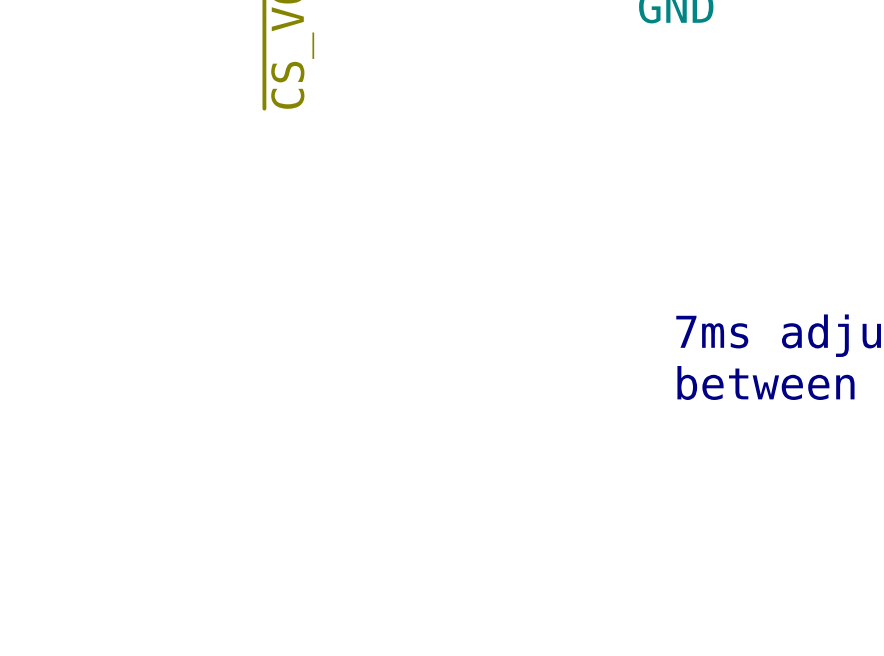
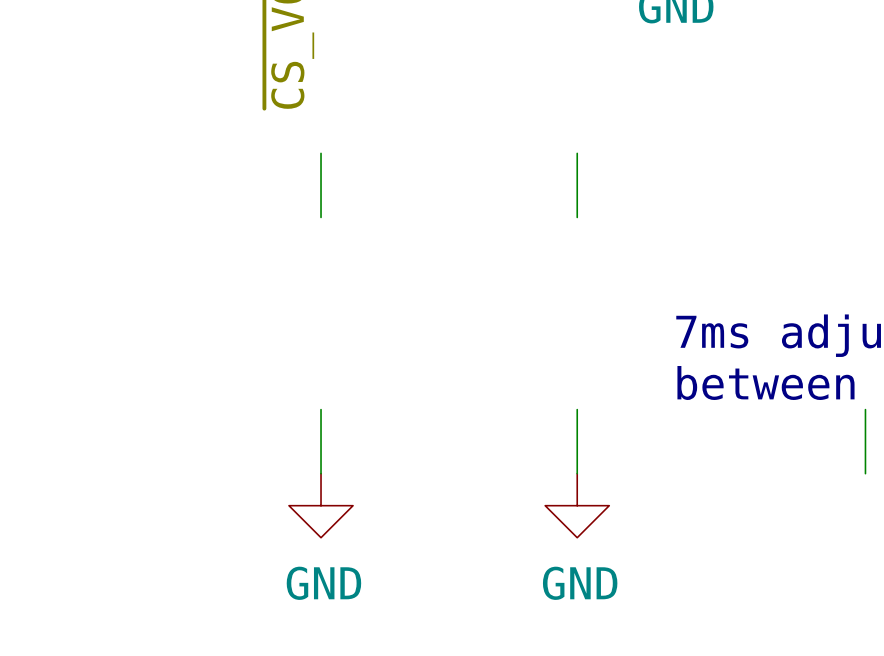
wire: none -> (321, 153) (321, 217)
wire: none -> (577, 153) (577, 217)
wire: none -> (321, 409) (321, 473)
wire: none -> (577, 409) (577, 473)
wire: none -> (865, 409) (865, 473)
power symbol: none -> GND (321, 505)
power symbol: none -> GND (577, 505)

